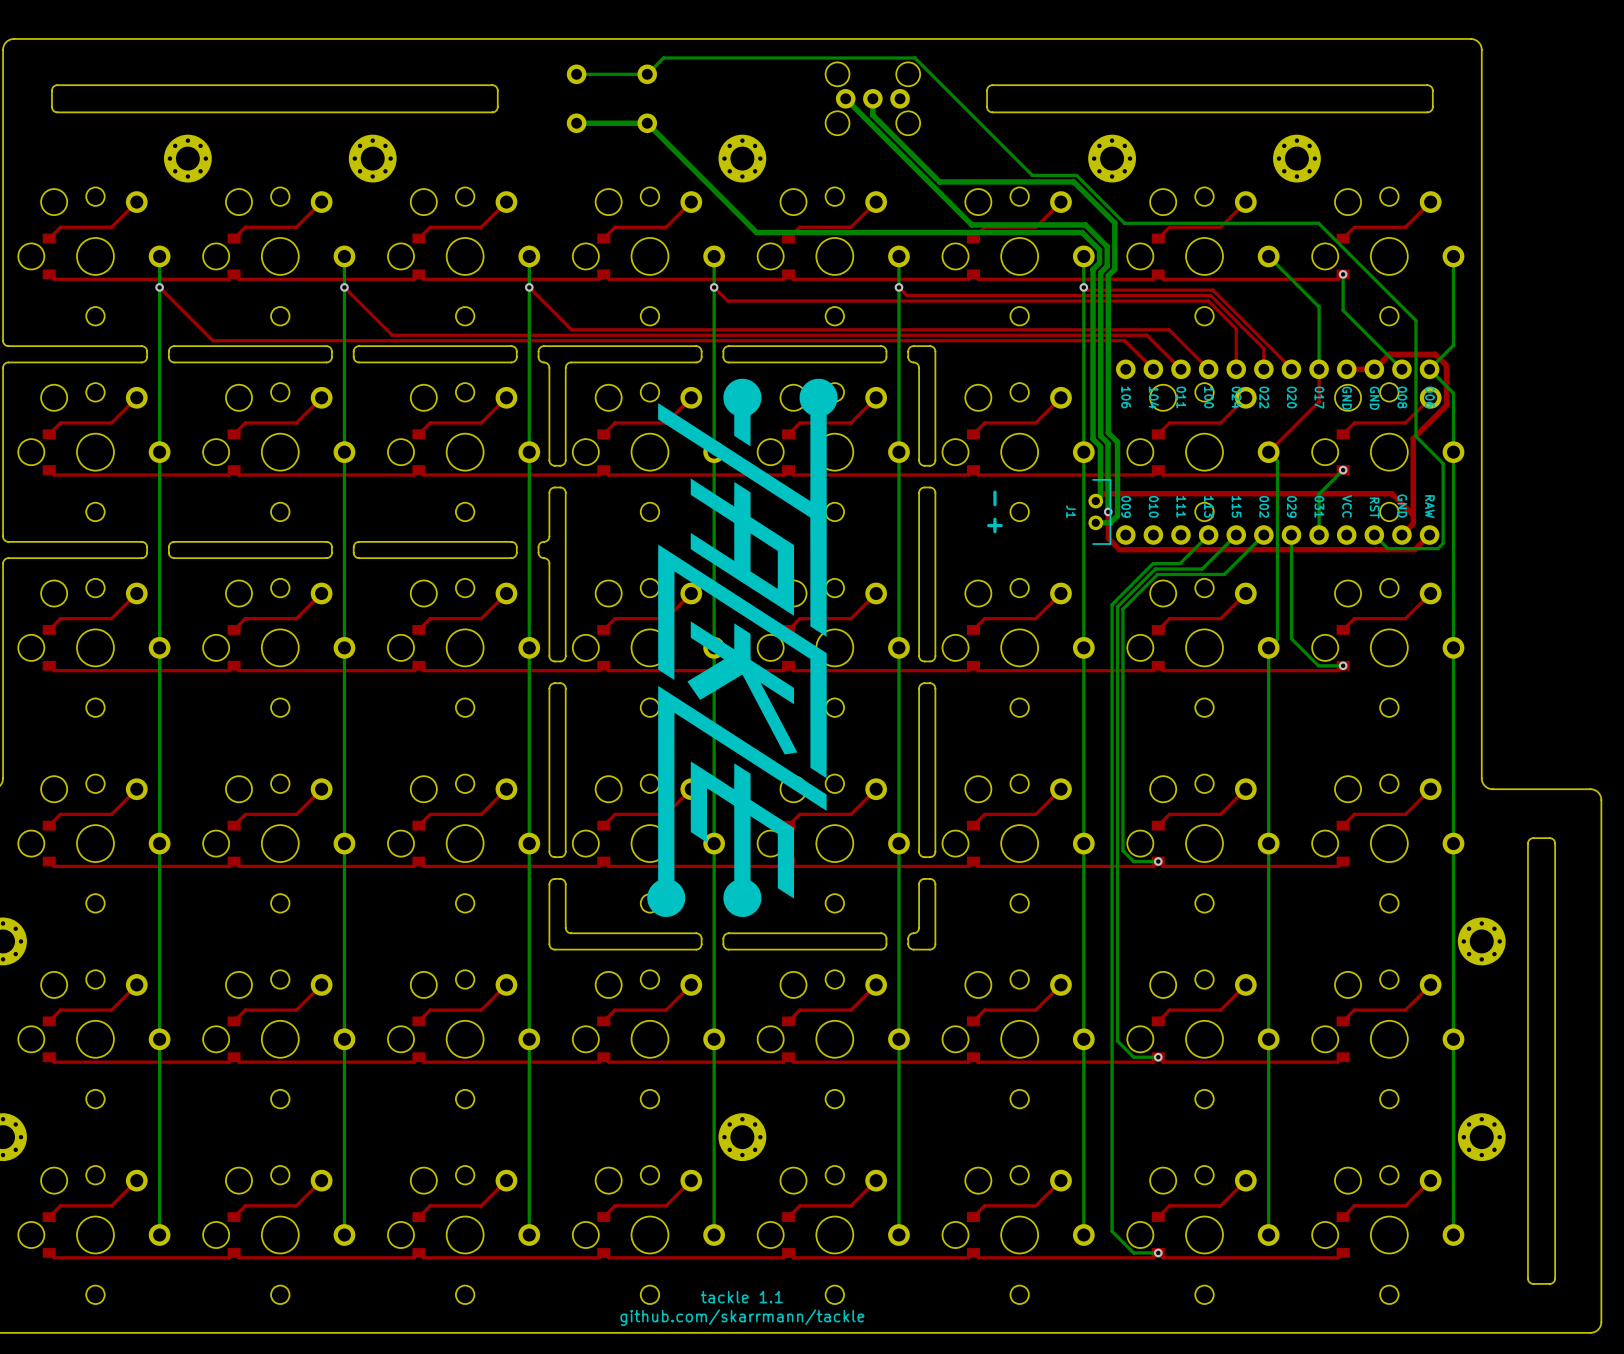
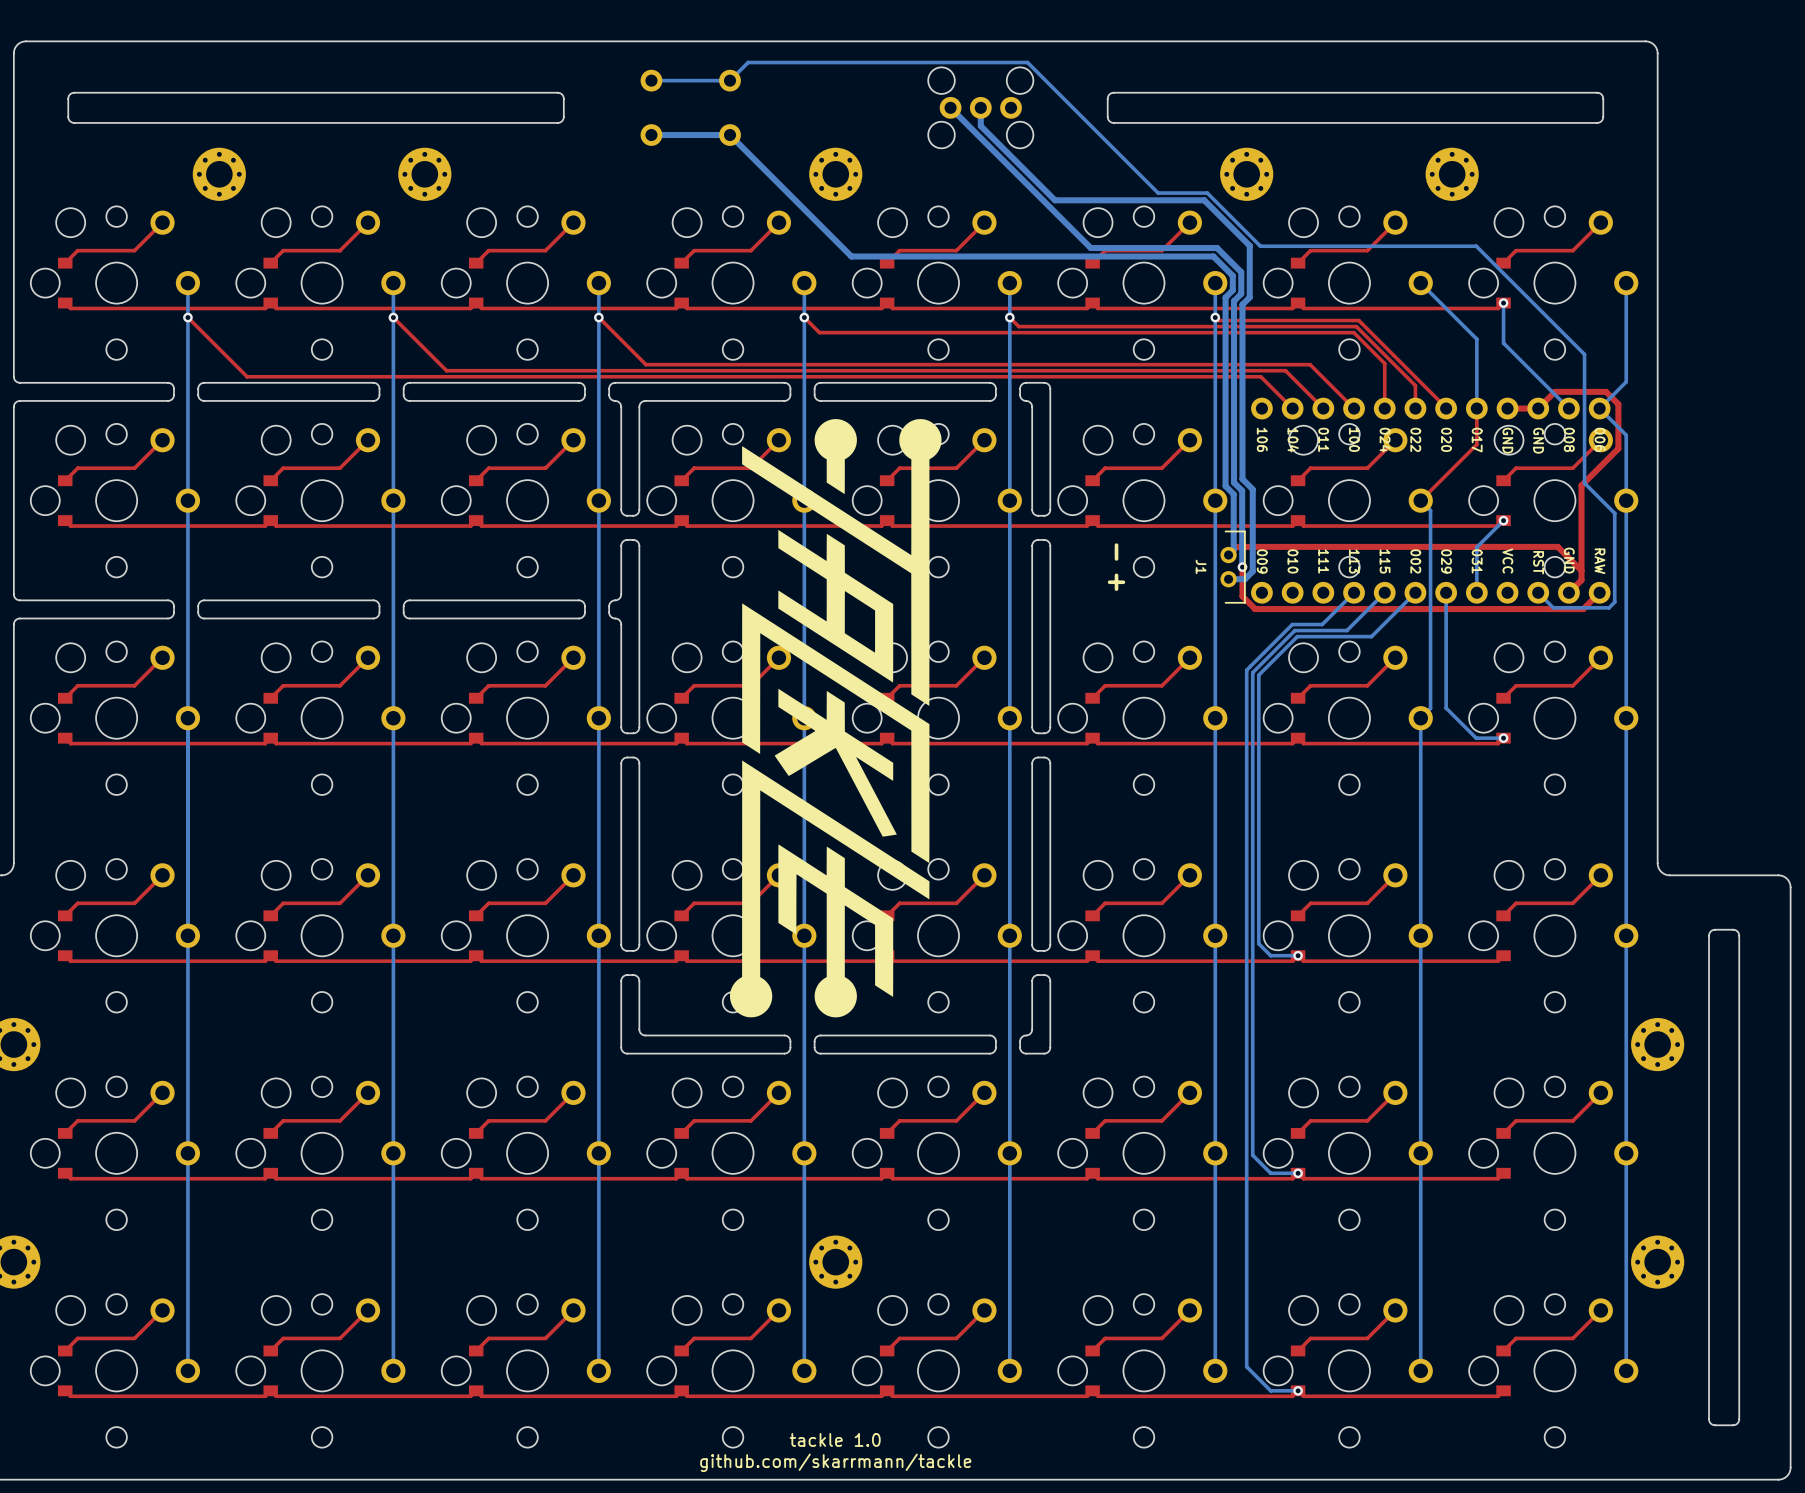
text: tackle 1.1 (741, 1297) -> tackle 1.0 (835, 1439)

